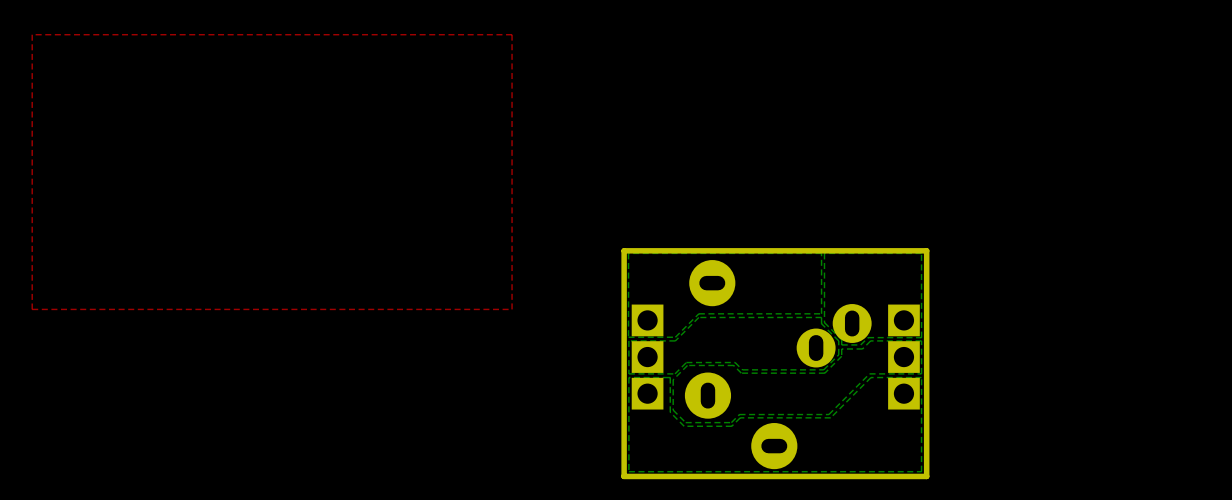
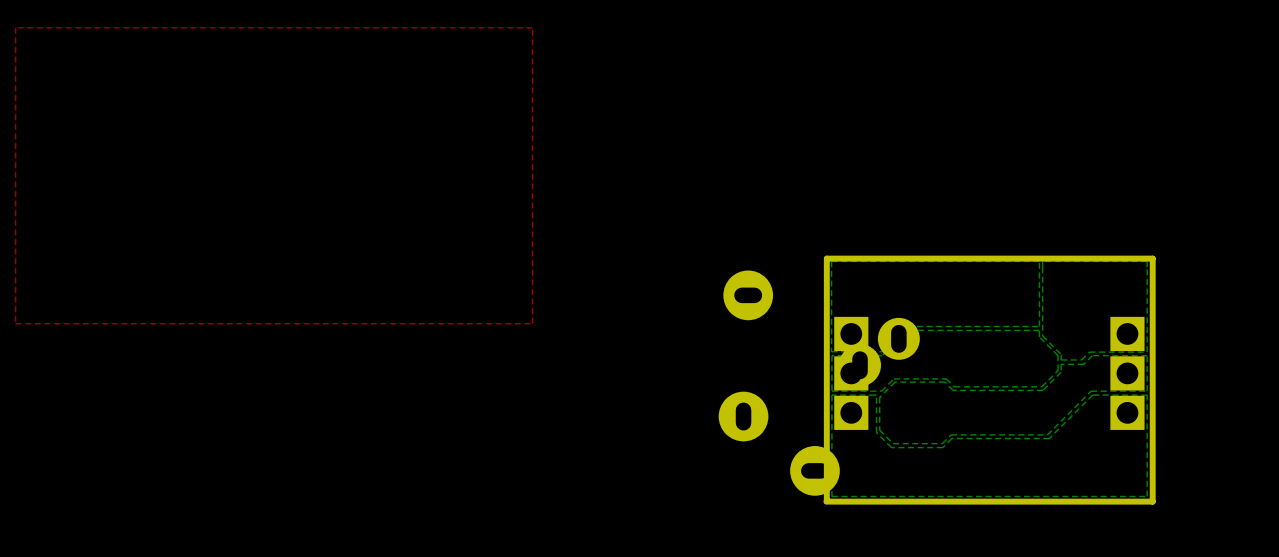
bottom zone outline: (821, 253) (628, 253) (628, 337) (675, 337) (698, 313) (821, 313) (821, 253) -> (1039, 261) (831, 261) (831, 351) (882, 351) (907, 326) (1039, 326) (1039, 261)
bottom zone outline: (921, 253) (921, 337) (868, 337) (860, 344) (841, 344) (841, 339) (824, 322) (824, 253) (921, 253) -> (1147, 261) (1147, 352) (1089, 352) (1081, 359) (1061, 359) (1061, 354) (1042, 335) (1042, 261) (1147, 261)
bottom zone outline: (821, 317) (821, 323) (838, 340) (838, 354) (823, 369) (742, 369) (735, 362) (686, 362) (675, 373) (628, 373) (628, 340) (675, 340) (698, 317) (821, 317) -> (1039, 330) (1039, 337) (1058, 355) (1058, 370) (1041, 386) (954, 386) (946, 378) (893, 378) (881, 391) (831, 391) (831, 355) (882, 355) (907, 330) (1039, 330)
bottom zone outline: (921, 340) (921, 373) (869, 373) (828, 414) (739, 414) (731, 422) (685, 422) (673, 410) (673, 379) (687, 365) (733, 365) (741, 373) (824, 373) (841, 356) (841, 348) (862, 348) (870, 340) (921, 340) -> (1147, 355) (1147, 391) (1091, 391) (1047, 434) (951, 434) (942, 443) (893, 443) (879, 430) (879, 397) (895, 382) (944, 382) (953, 390) (1043, 390) (1061, 372) (1061, 364) (1083, 364) (1092, 355) (1147, 355)
part: none -> (851, 373)
part: none -> (1127, 373)
part: (647, 357) -> none
part: (903, 357) -> none
bottom zone outline: (921, 377) (921, 471) (628, 471) (628, 377) (670, 377) (670, 412) (684, 426) (731, 426) (740, 417) (830, 417) (871, 377) (921, 377) -> (1147, 395) (1147, 496) (831, 496) (831, 395) (876, 395) (876, 432) (891, 447) (942, 447) (951, 438) (1049, 438) (1092, 395) (1147, 395)
board edge: (624, 476) (624, 250) (926, 250) (926, 476) (623, 476) -> (826, 501) (826, 258) (1152, 258) (1152, 501) (826, 501)

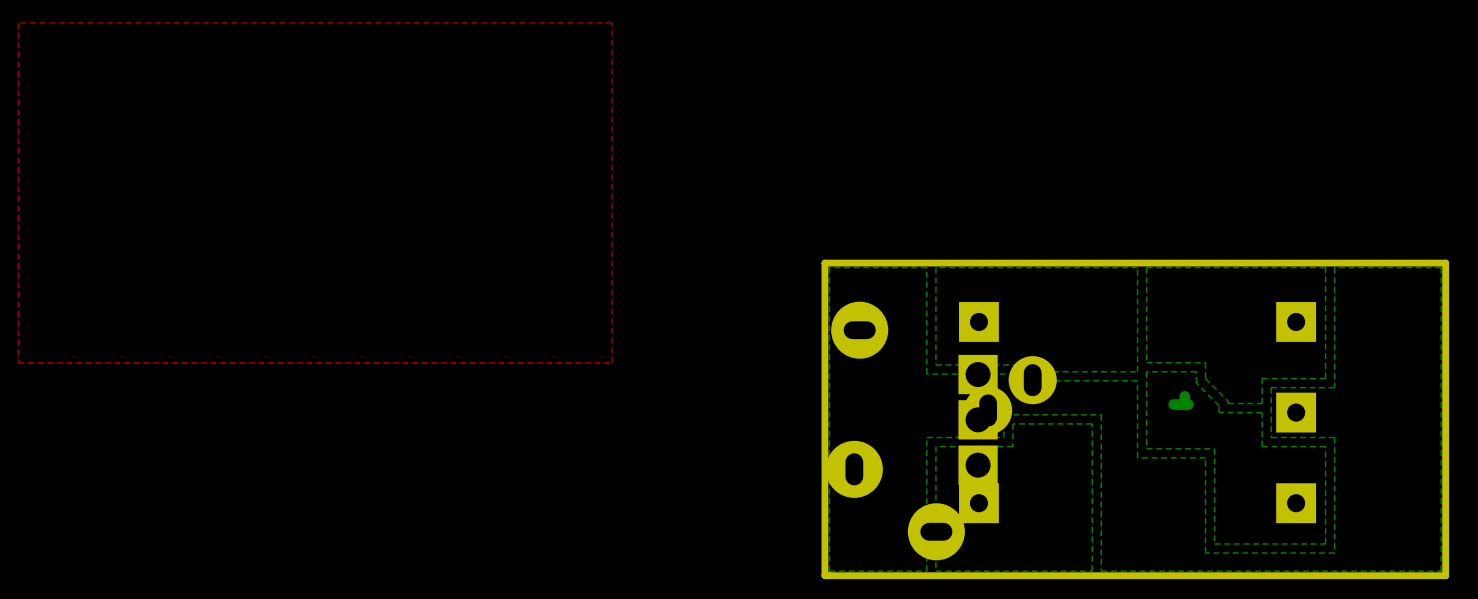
board edge: none -> (1445, 263) (824, 263) (824, 575) (1445, 575) (1445, 263)
bottom zone outline: none -> (1137, 267) (935, 267) (935, 365) (1024, 365) (1024, 371) (1137, 371) (1137, 267)
bottom zone outline: none -> (1441, 267) (1441, 571) (1101, 571) (1101, 414) (1003, 414) (1003, 437) (926, 437) (926, 571) (829, 571) (829, 267) (926, 267) (926, 374) (1015, 374) (1015, 380) (1137, 380) (1137, 457) (1205, 457) (1205, 553) (1334, 553) (1334, 437) (1271, 437) (1271, 387) (1334, 387) (1334, 267) (1441, 267)
bottom zone outline: (1039, 261) (831, 261) (831, 351) (882, 351) (907, 326) (1039, 326) (1039, 261) -> none
bottom zone outline: (1147, 261) (1147, 352) (1089, 352) (1081, 359) (1061, 359) (1061, 354) (1042, 335) (1042, 261) (1147, 261) -> (1325, 267) (1325, 378) (1262, 378) (1262, 403) (1228, 403) (1228, 401) (1205, 378) (1205, 362) (1146, 362) (1146, 267) (1325, 267)
part: none -> (978, 321)
part: none -> (1296, 321)
part footprint: [1110, 316, 1145, 430] -> [1276, 392, 1317, 433]
bottom zone outline: (1039, 330) (1039, 337) (1058, 355) (1058, 370) (1041, 386) (954, 386) (946, 378) (893, 378) (881, 391) (831, 391) (831, 355) (882, 355) (907, 330) (1039, 330) -> none
bottom track: none -> (1184, 396) (1184, 404)
bottom track: none -> (1188, 404) (1173, 404)
bottom zone outline: (1061, 364) (1083, 364) (1092, 355) (1147, 355) (1147, 391) (1091, 391) (1047, 434) (951, 434) (942, 443) (893, 443) (879, 430) (879, 397) (895, 382) (944, 382) (953, 390) (1043, 390) (1061, 372) (1061, 367) -> (1219, 409) (1219, 405) (1196, 383) (1196, 371) (1146, 371) (1146, 448) (1214, 448) (1214, 543) (1325, 543) (1325, 446) (1262, 446) (1262, 412) (1219, 412)
bottom zone outline: none -> (1092, 423) (1092, 571) (935, 571) (935, 446) (1012, 446) (1012, 423) (1092, 423)
bottom zone outline: (1147, 395) (1147, 496) (831, 496) (831, 395) (876, 395) (876, 432) (891, 447) (942, 447) (951, 438) (1049, 438) (1092, 395) (1147, 395) -> none
part: none -> (978, 503)
part: none -> (1296, 503)
board edge: (826, 501) (826, 258) (1152, 258) (1152, 501) (826, 501) -> none

